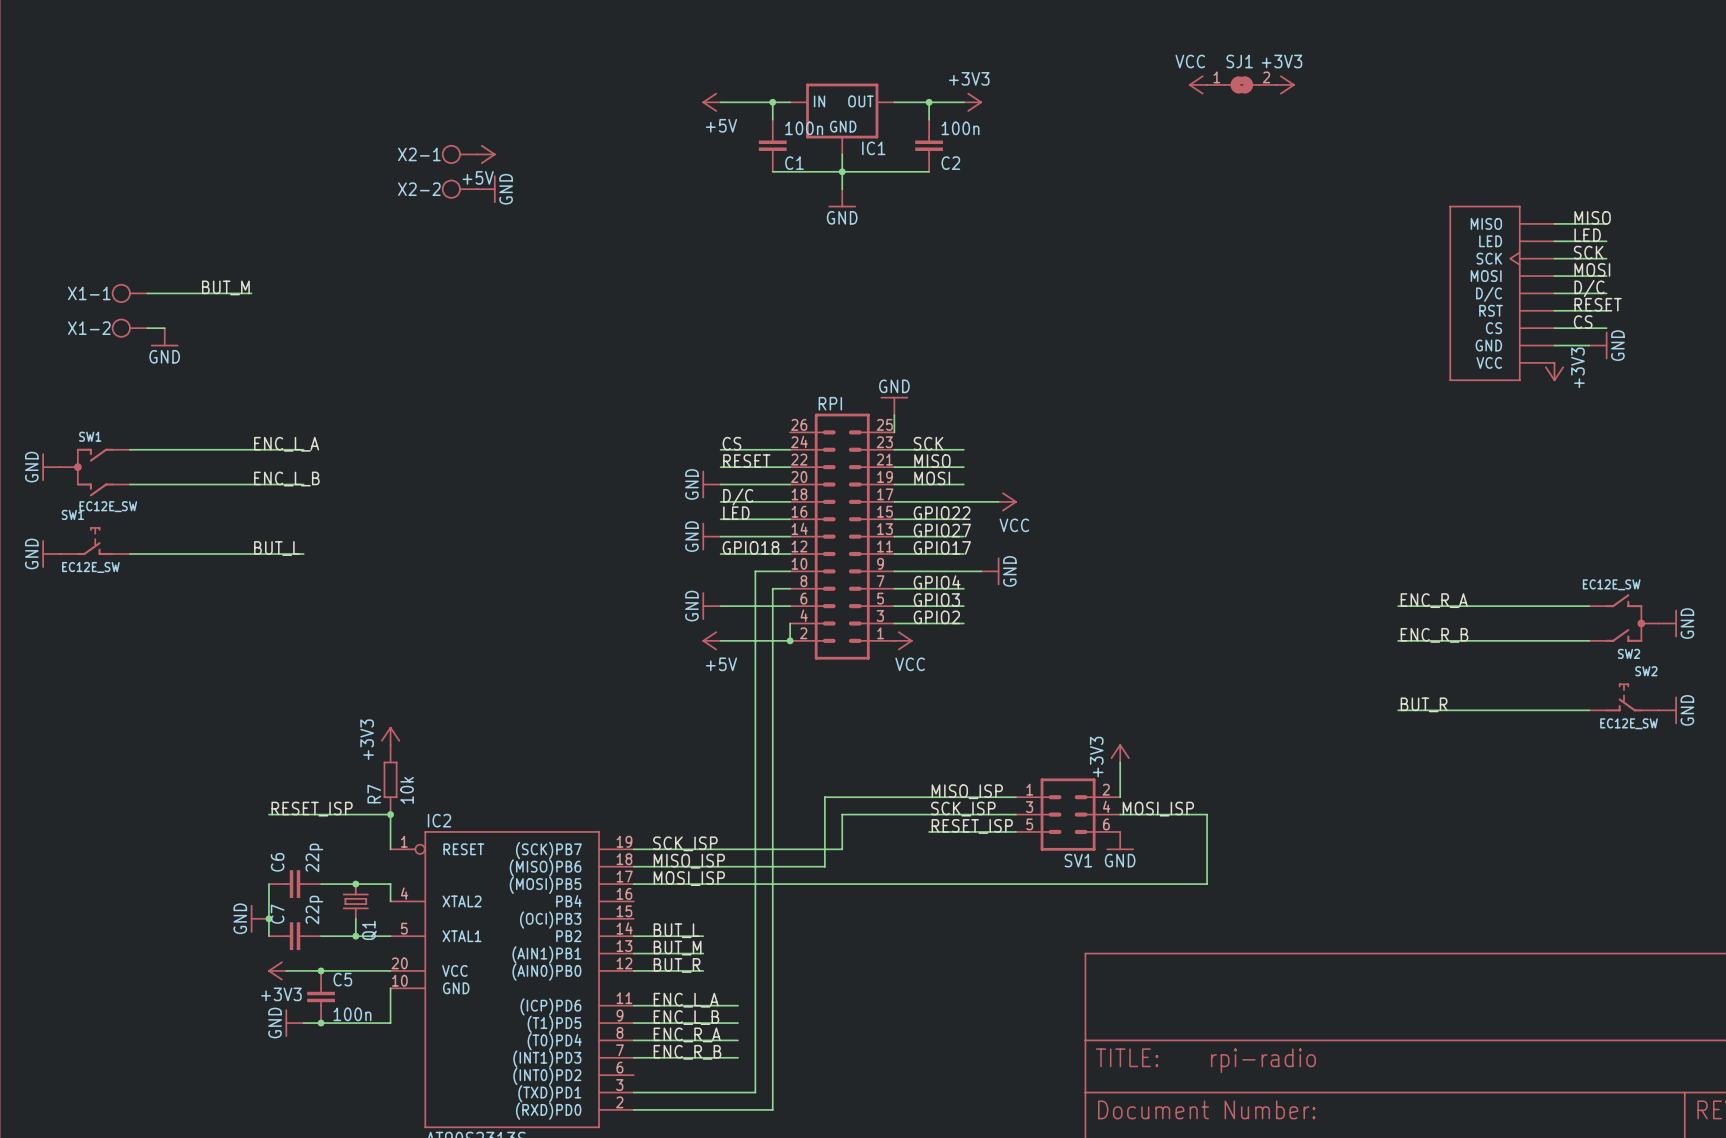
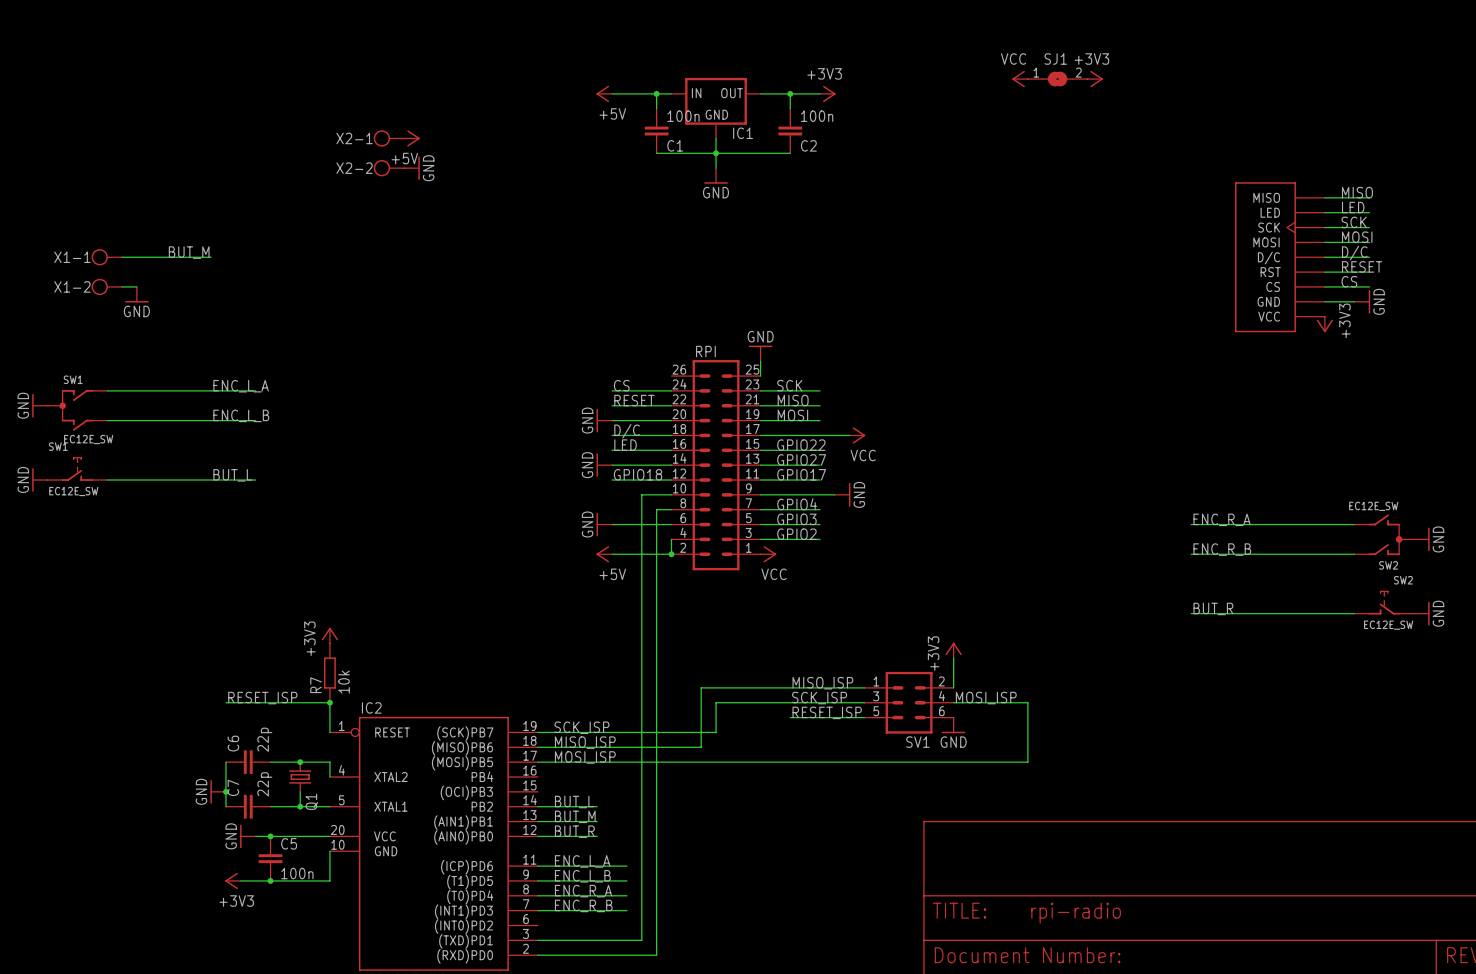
power symbol position: +3V3 (277, 970) -> +3V3 (233, 880)
power symbol position: GND (294, 1023) -> GND (247, 836)

